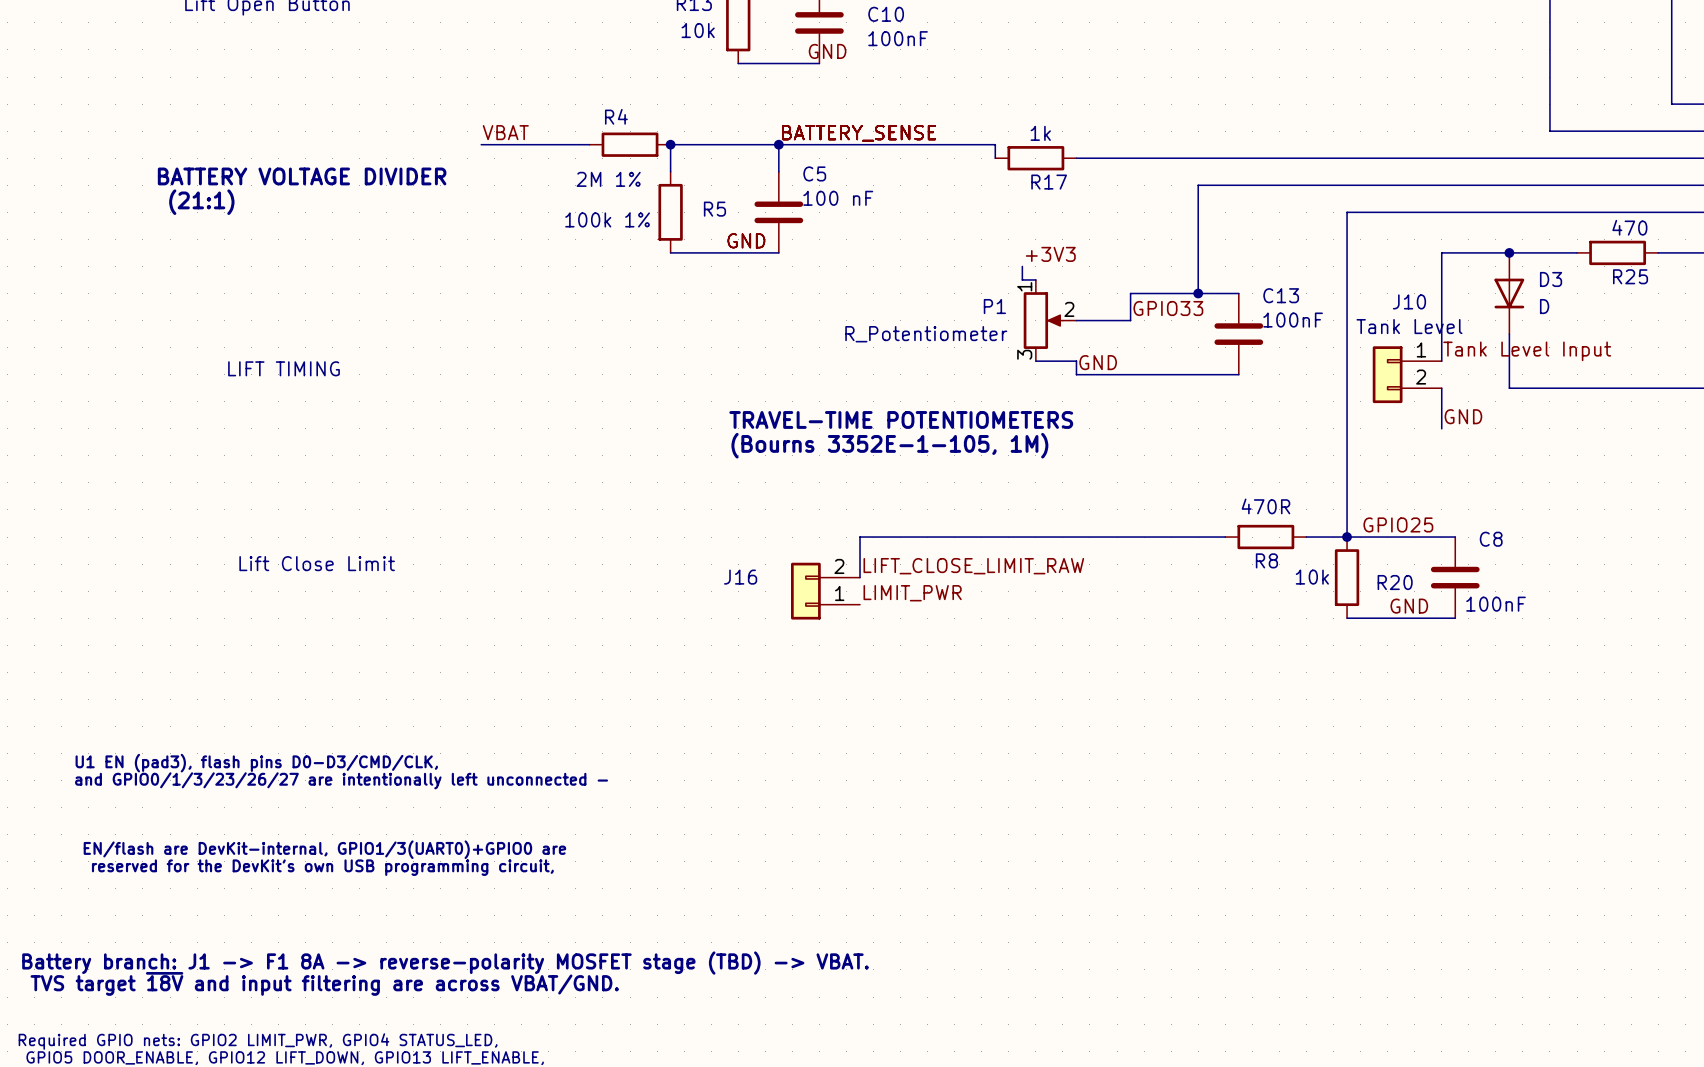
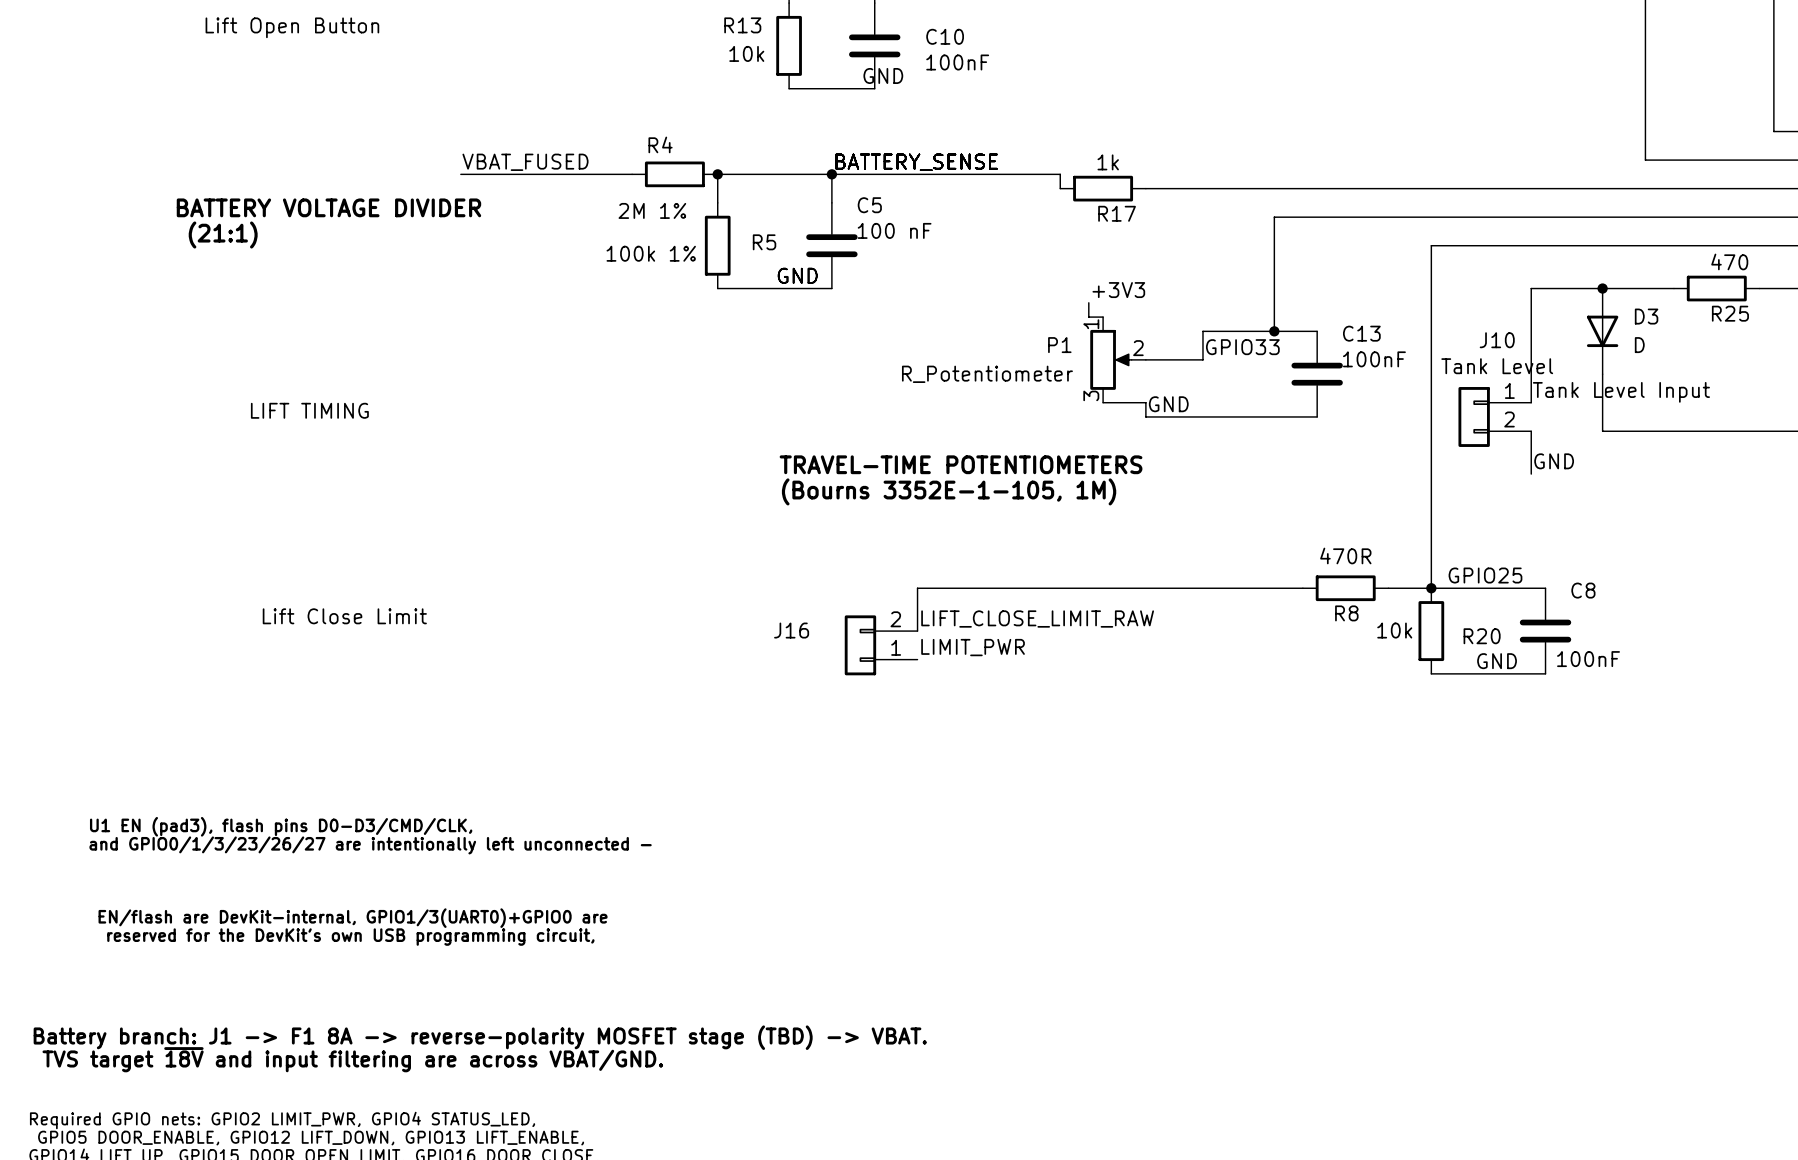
label: VBAT (505, 132) -> none
label: none -> VBAT_FUSED (525, 162)
wire: none -> (460, 174) (517, 174)

